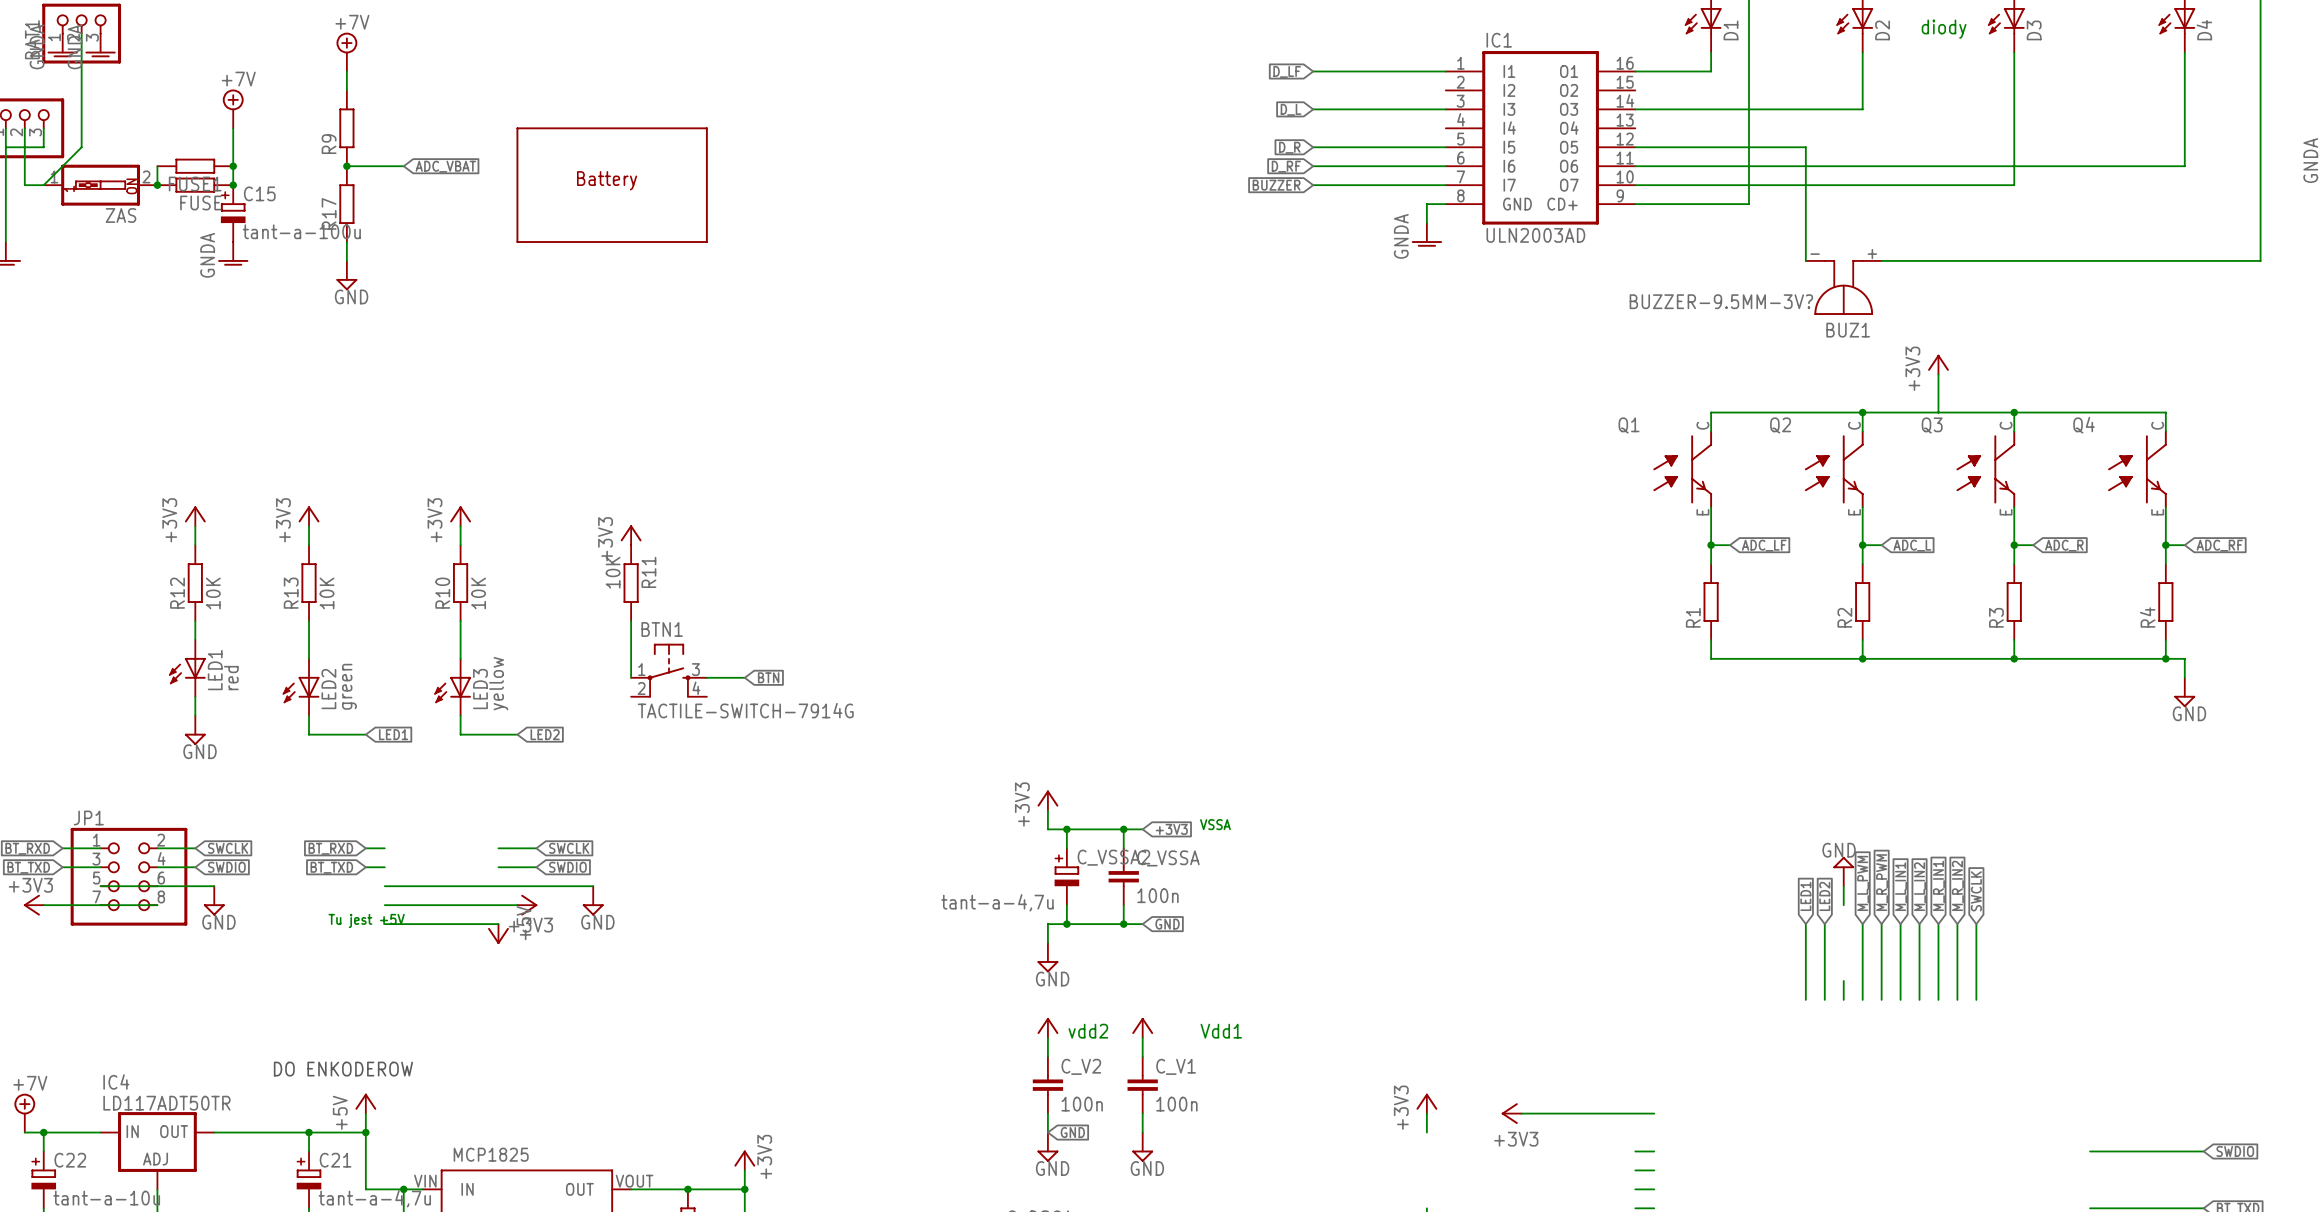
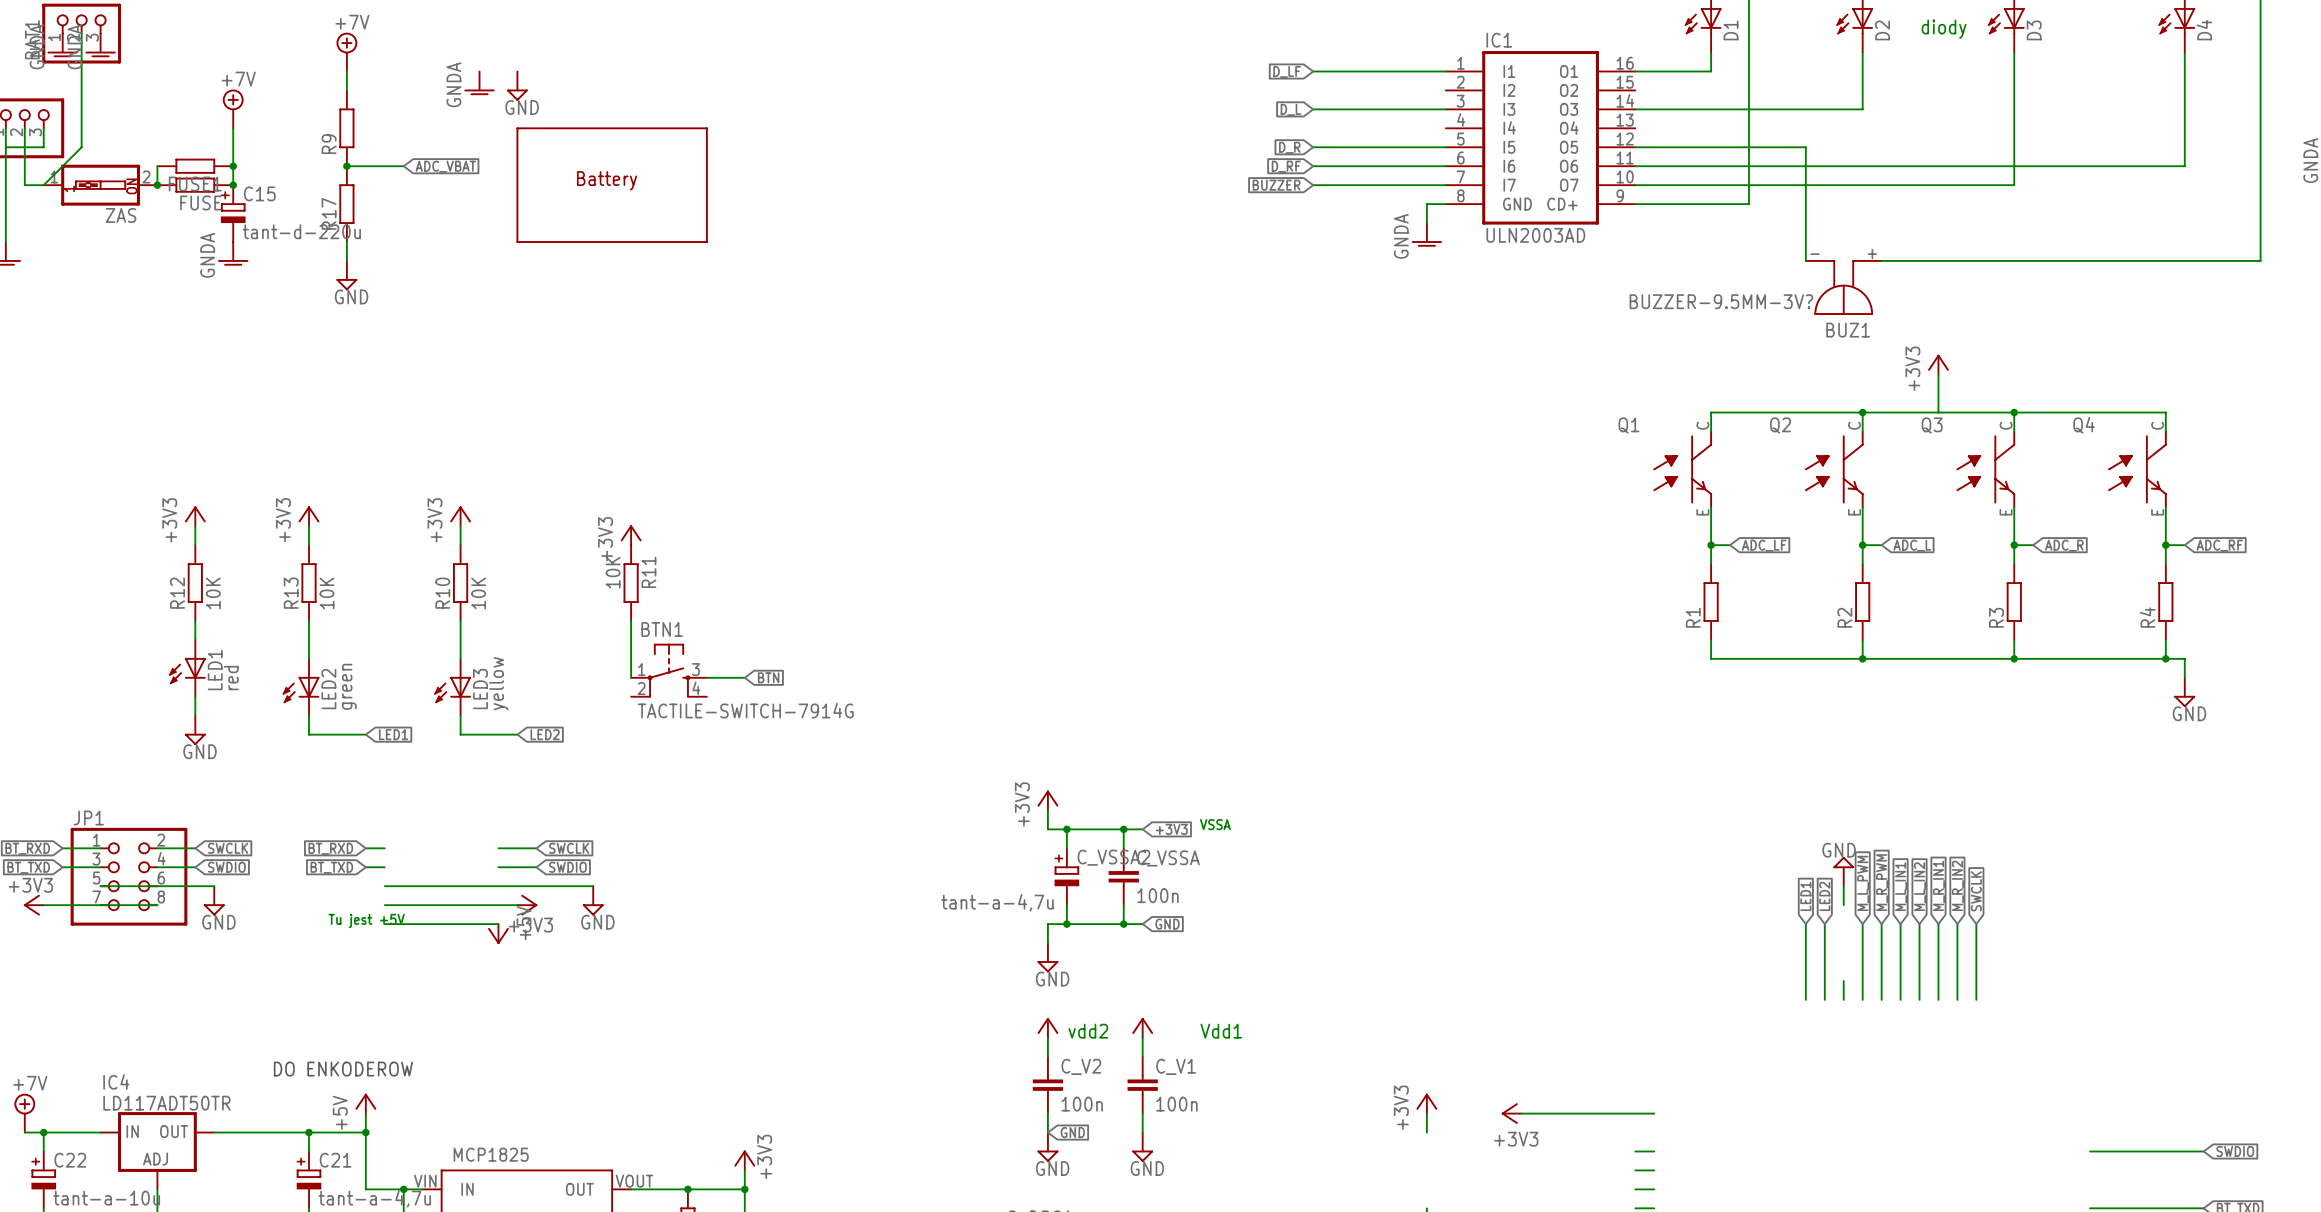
power symbol: none -> GNDA (479, 83)
power symbol: none -> GND (517, 86)
C15 value: tant-a-100u (301, 231) -> tant-d-220u (301, 231)

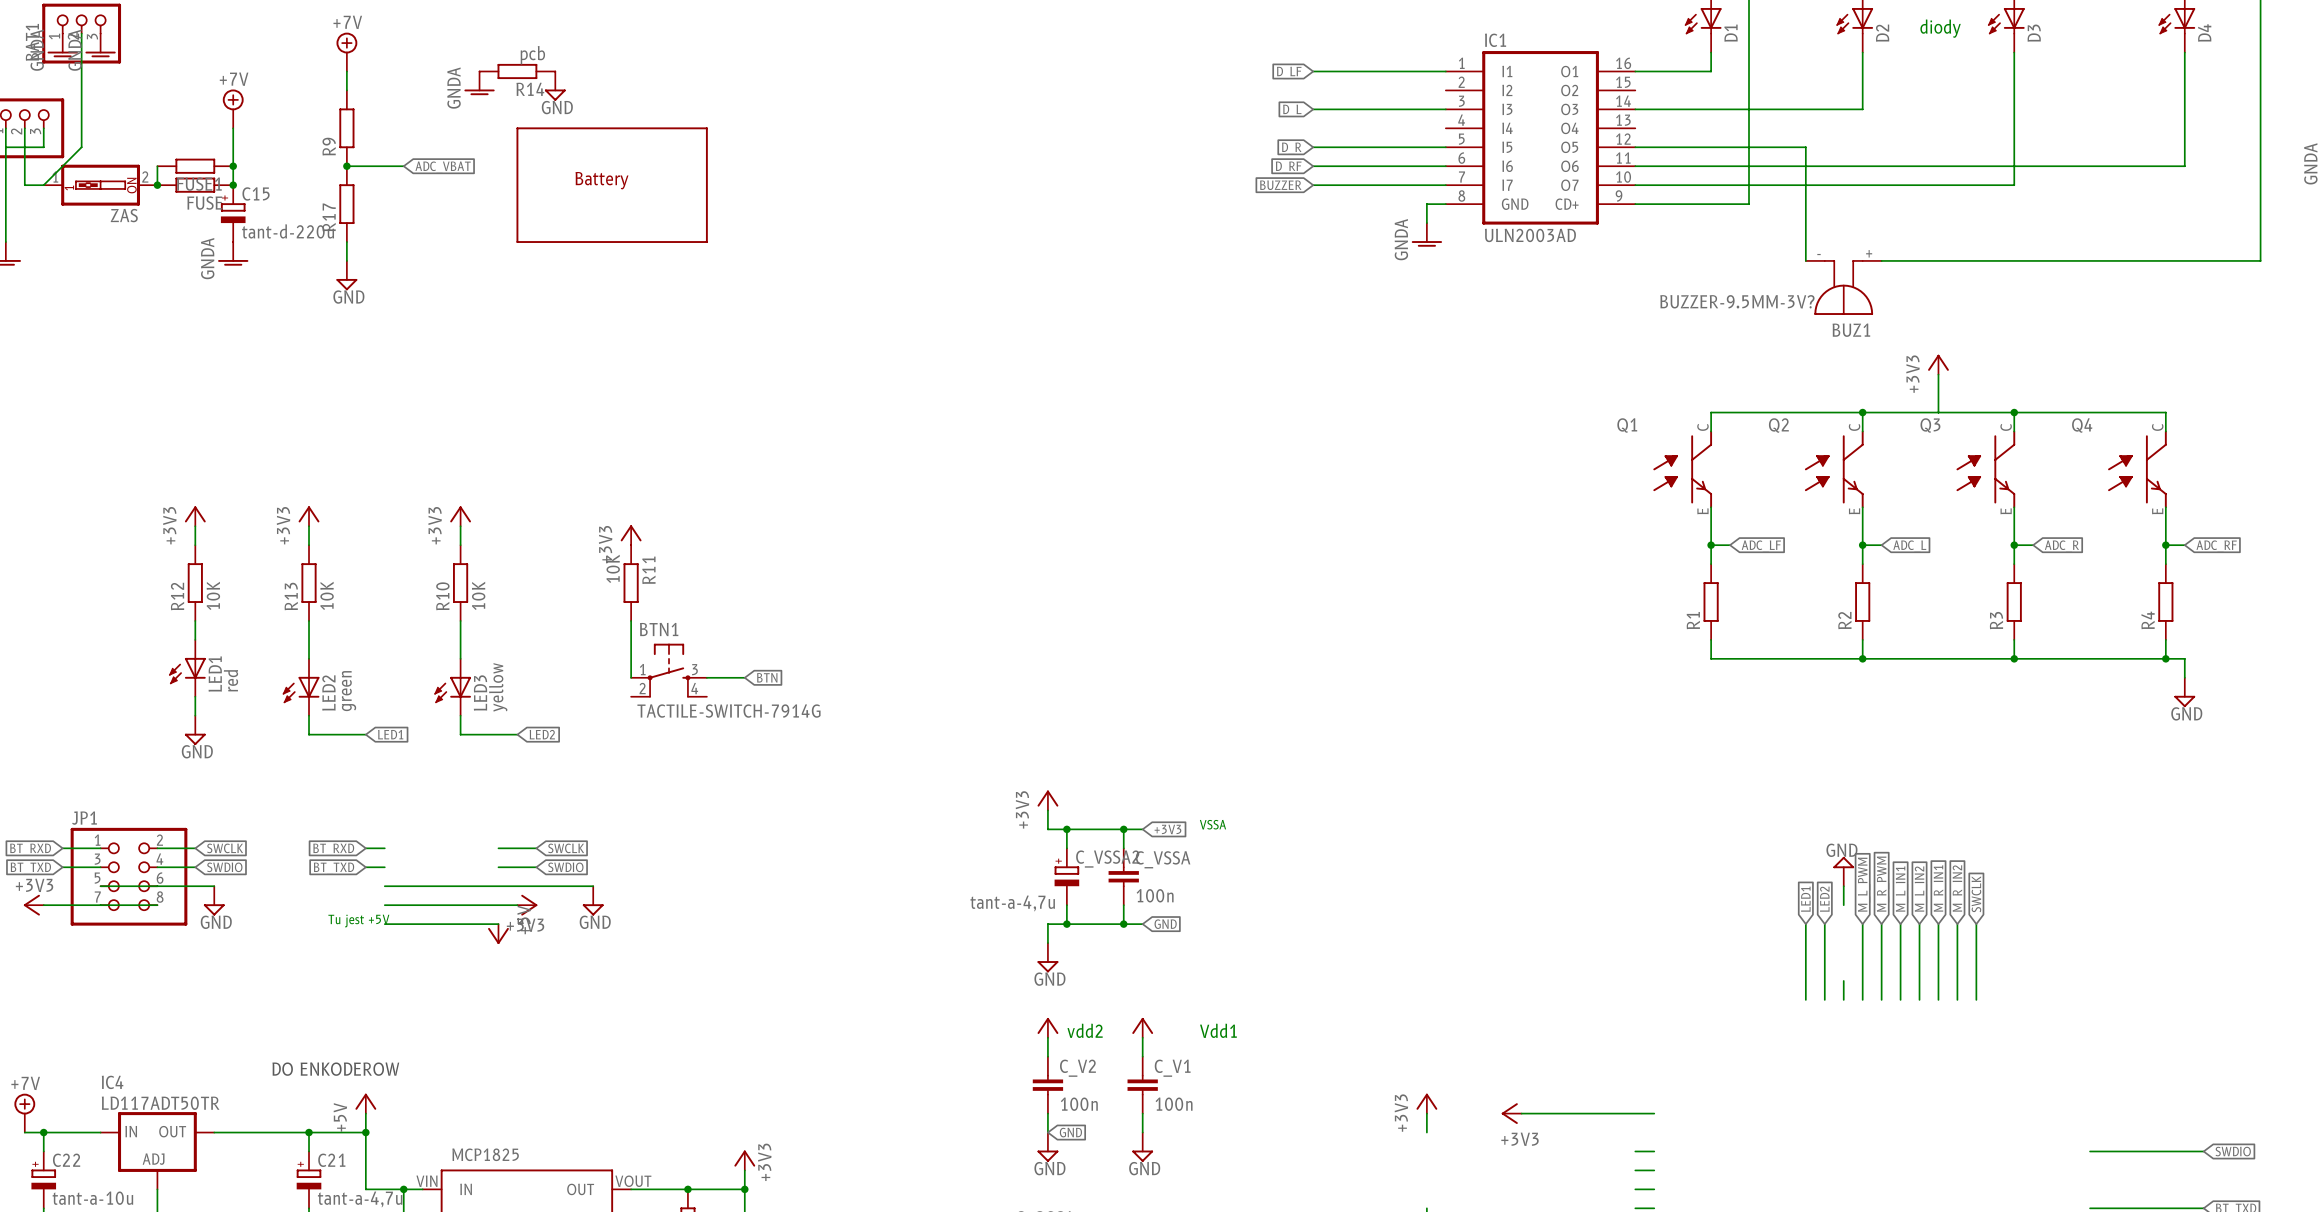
R14: none -> pcb (517, 71)
power symbol position: GND (517, 86) -> GND (555, 86)

